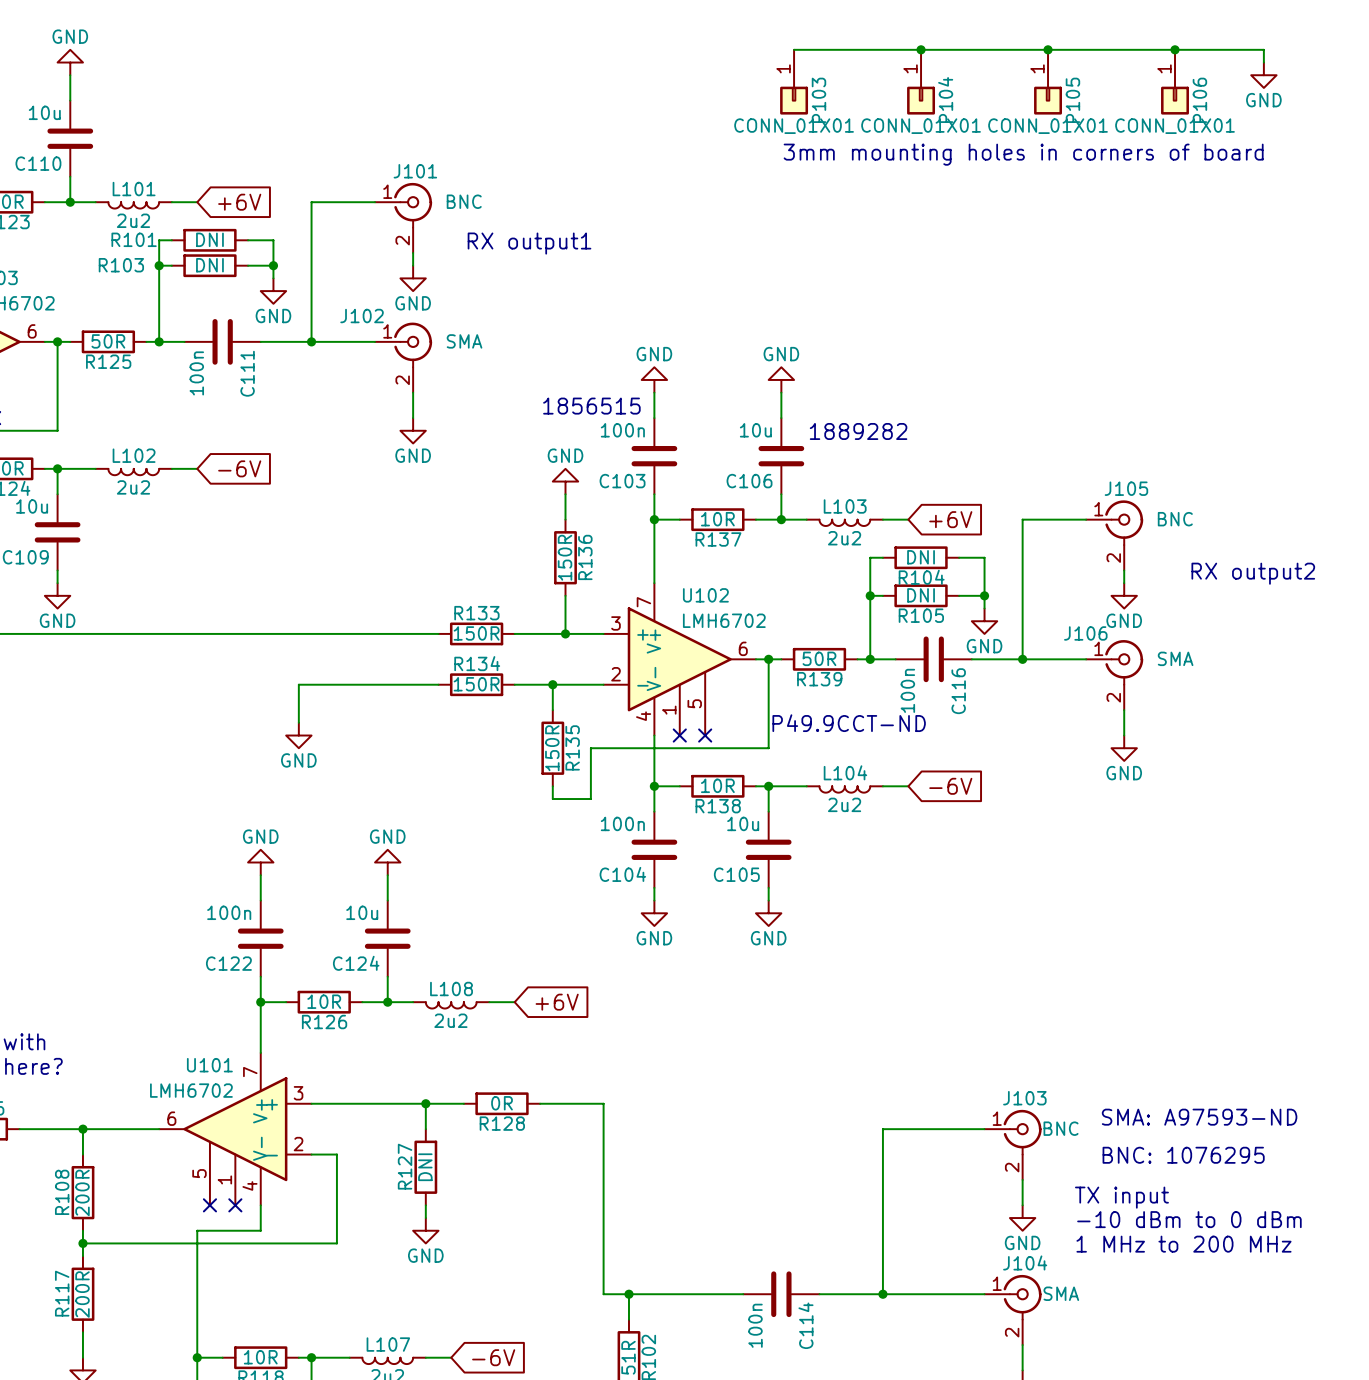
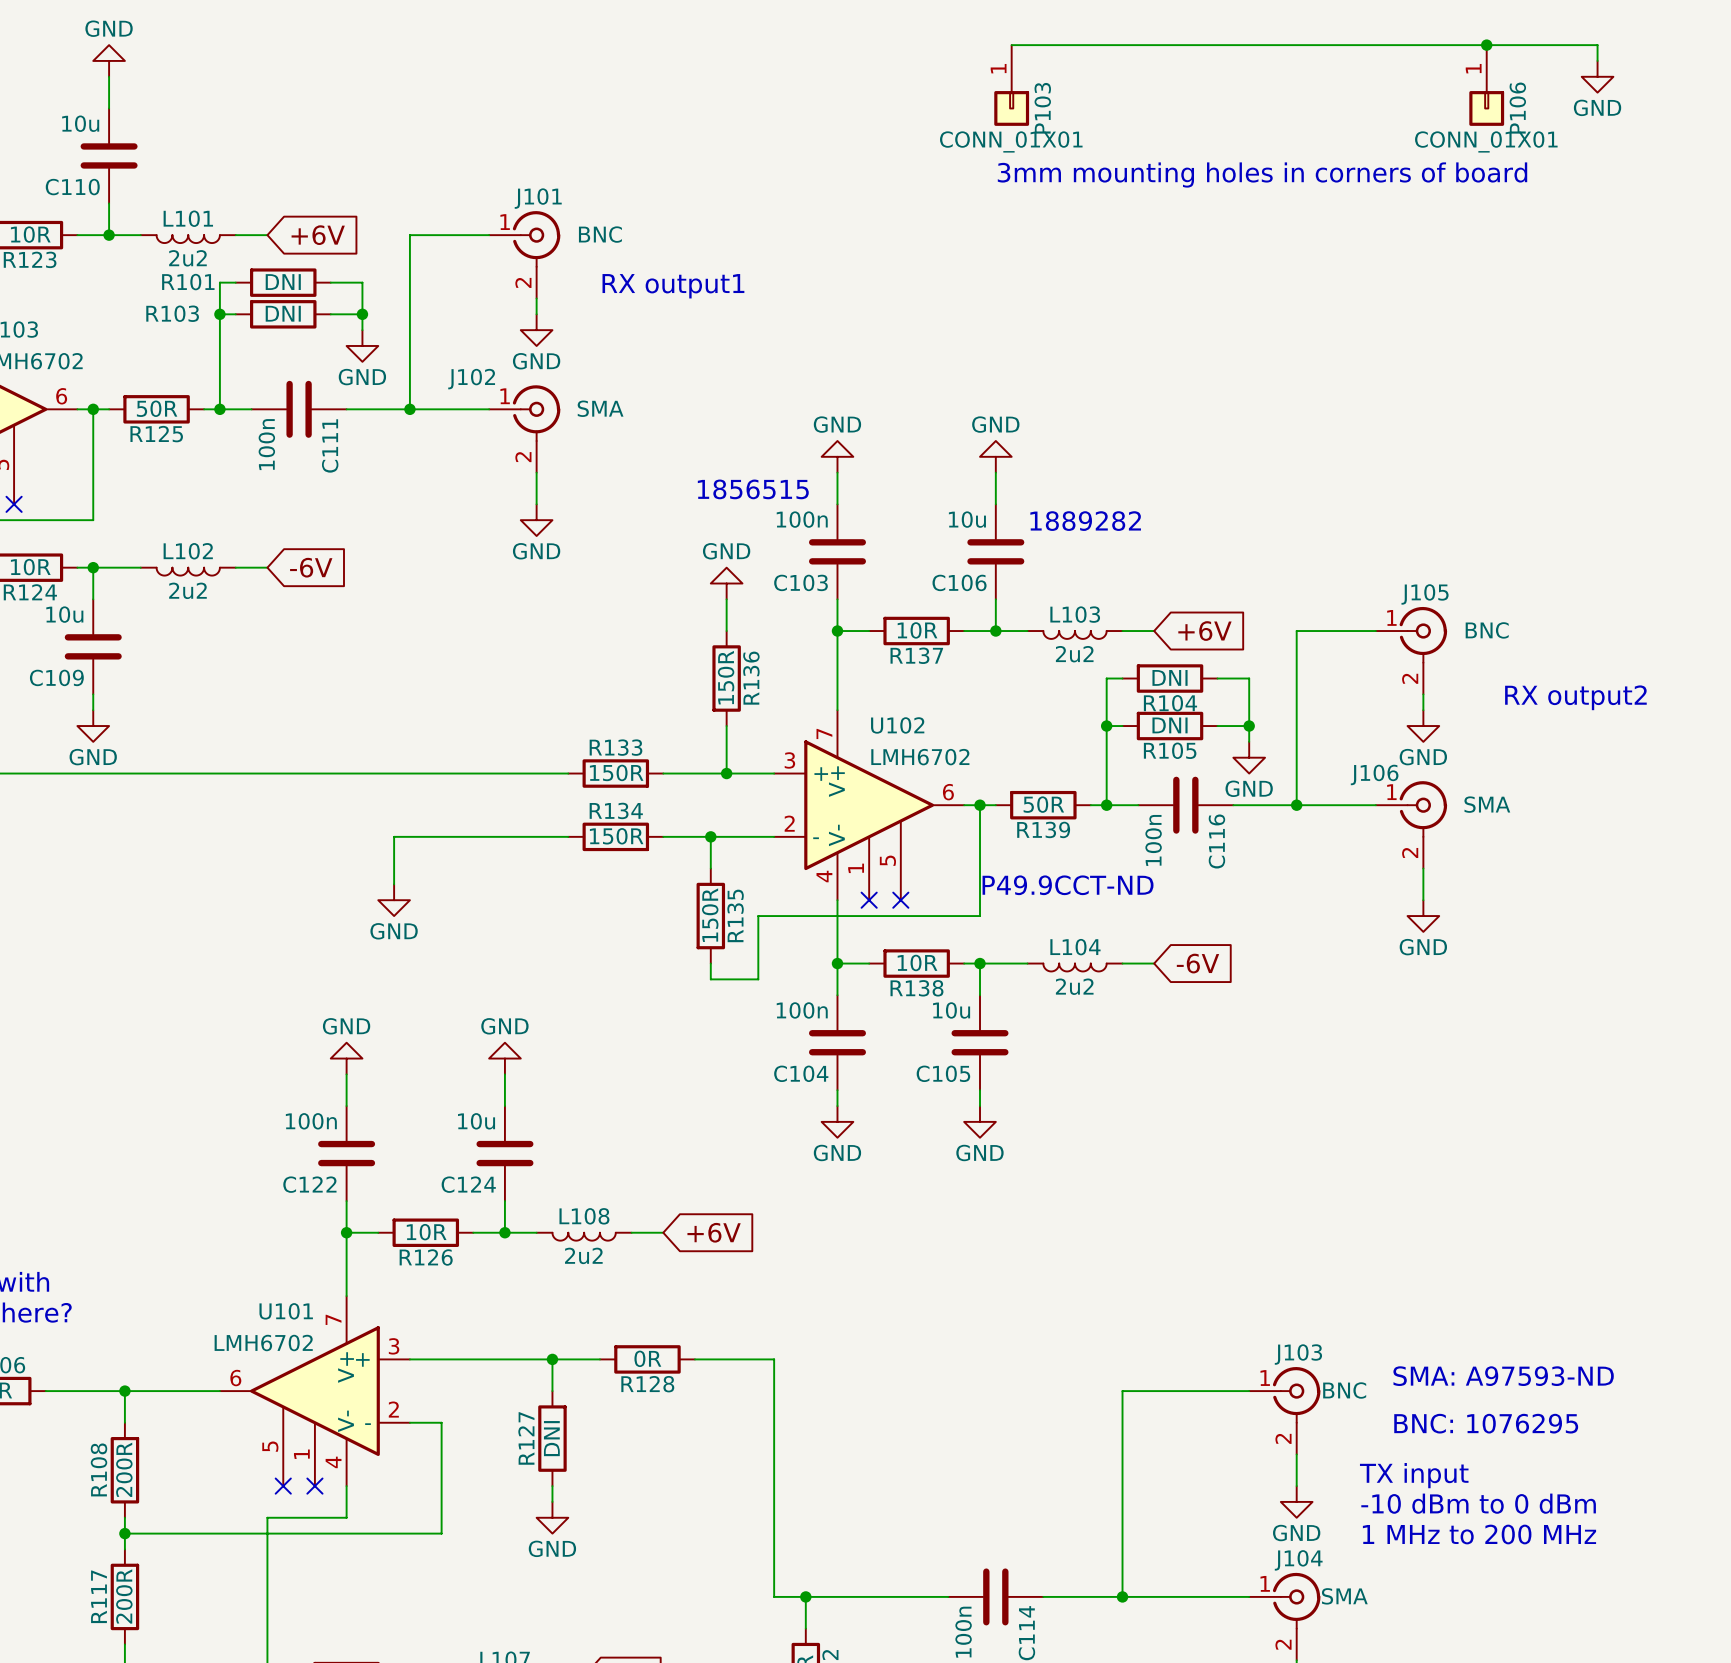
junction: (921, 49) -> none
junction: (1048, 49) -> none
P104: CONN_01X01 (921, 82) -> none
P105: CONN_01X01 (1048, 82) -> none

